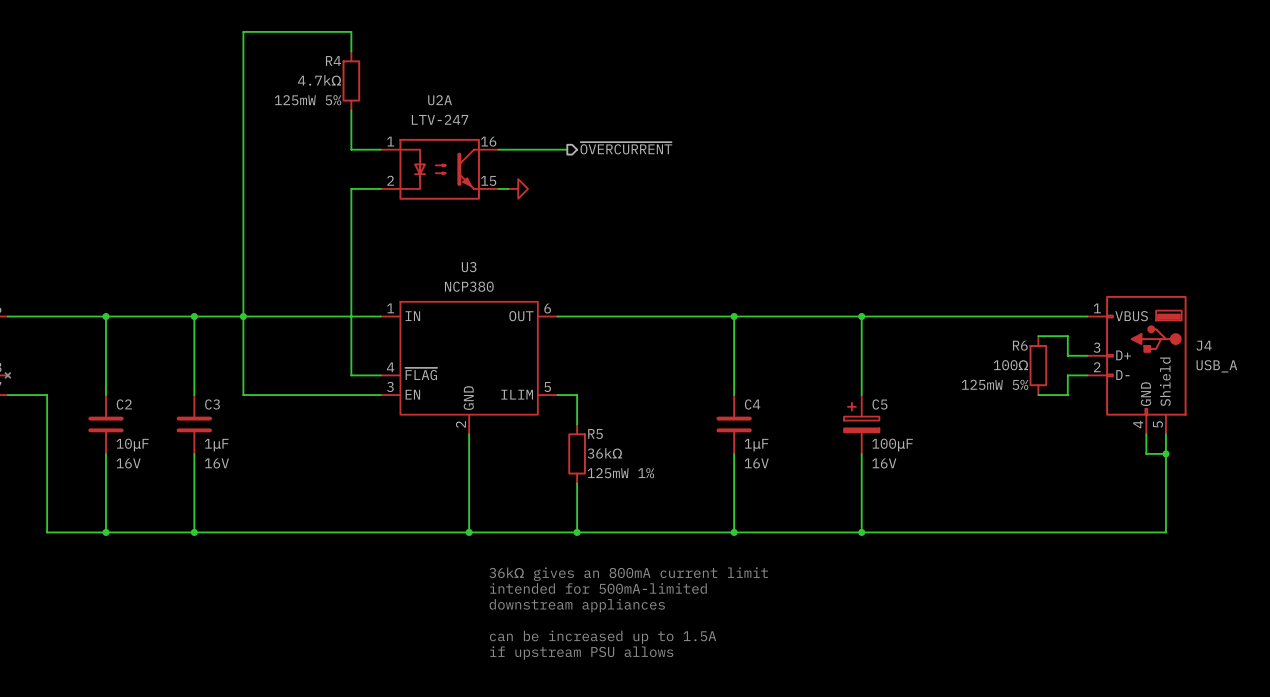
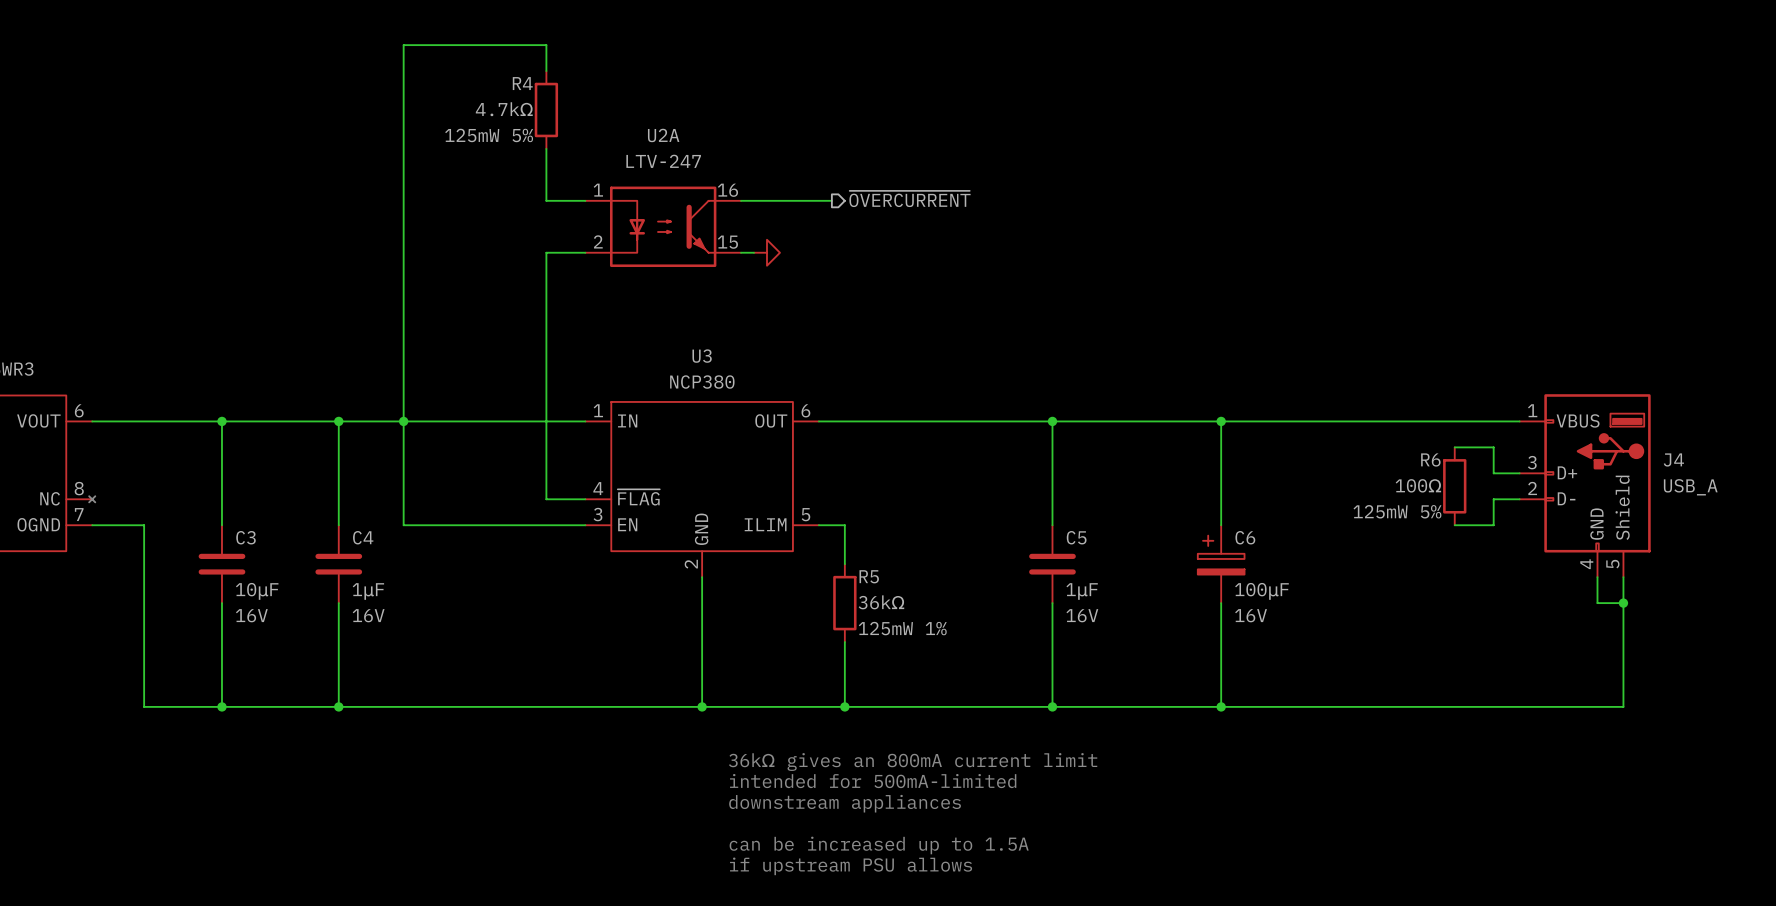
C2 name: C2 (124, 404) -> C3 (246, 537)
C3 name: C3 (212, 404) -> C4 (363, 537)
C4 name: C4 (752, 404) -> C5 (1076, 537)
C5 name: C5 (879, 404) -> C6 (1245, 537)

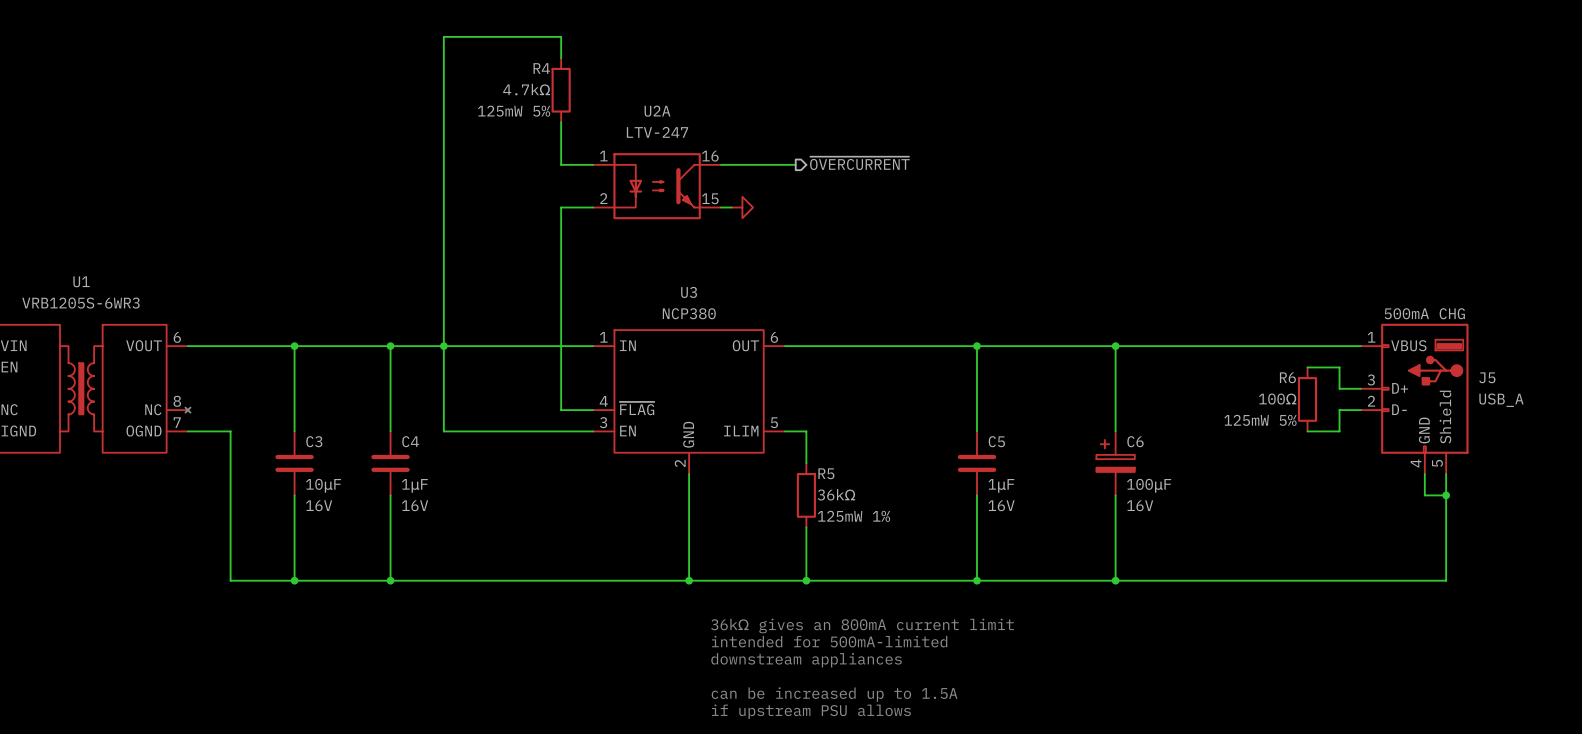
J4 text: none -> 500mA CHG (1424, 313)
J4 name: J4 (1673, 459) -> J5 (1487, 377)

